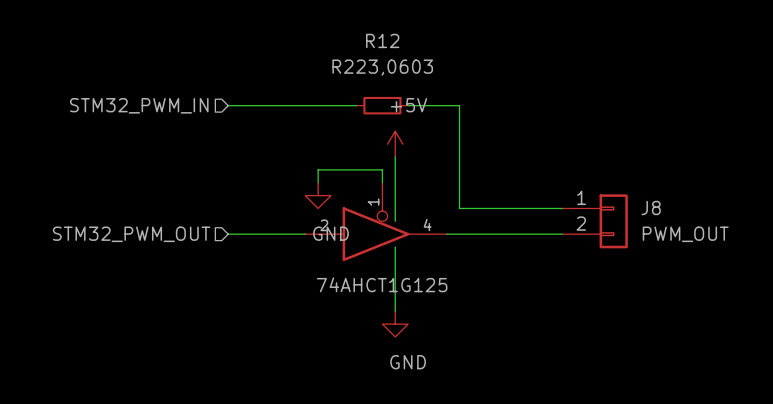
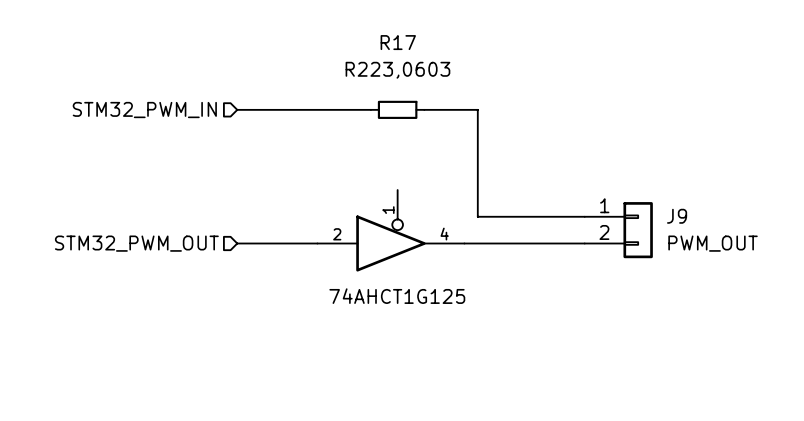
R12 name: R12 (382, 40) -> R17 (398, 42)
power symbol: +5V (395, 144) -> none
wire: (395, 157) (395, 221) -> none
wire: (318, 182) (318, 169) (382, 169) (382, 182) -> none
power symbol: GND (318, 195) -> none
J8 name: J8 (651, 207) -> J9 (677, 216)
wire: (395, 247) (395, 311) -> none
power symbol: GND (395, 324) -> none

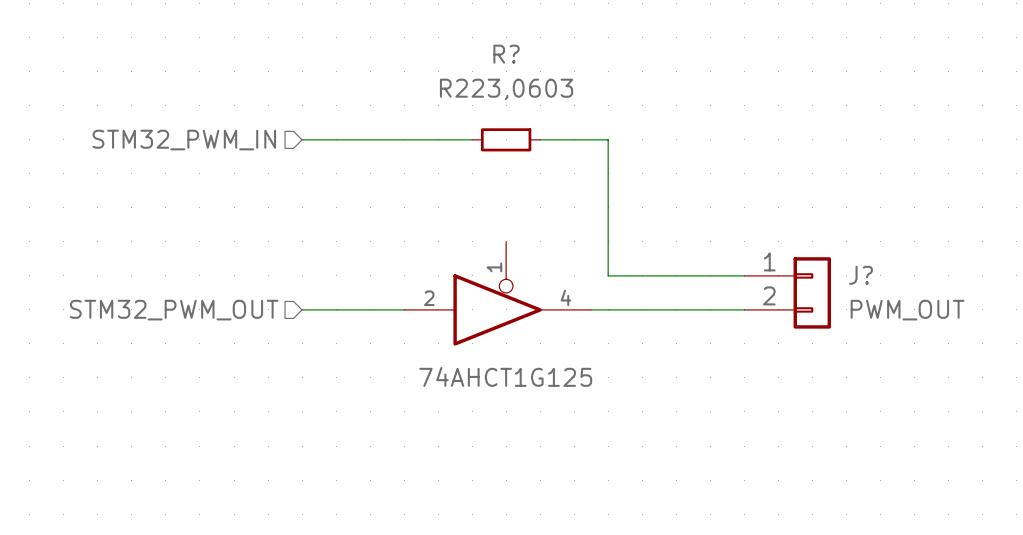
R17 name: R17 (398, 42) -> R? (506, 54)
J9 name: J9 (677, 216) -> J? (860, 275)

